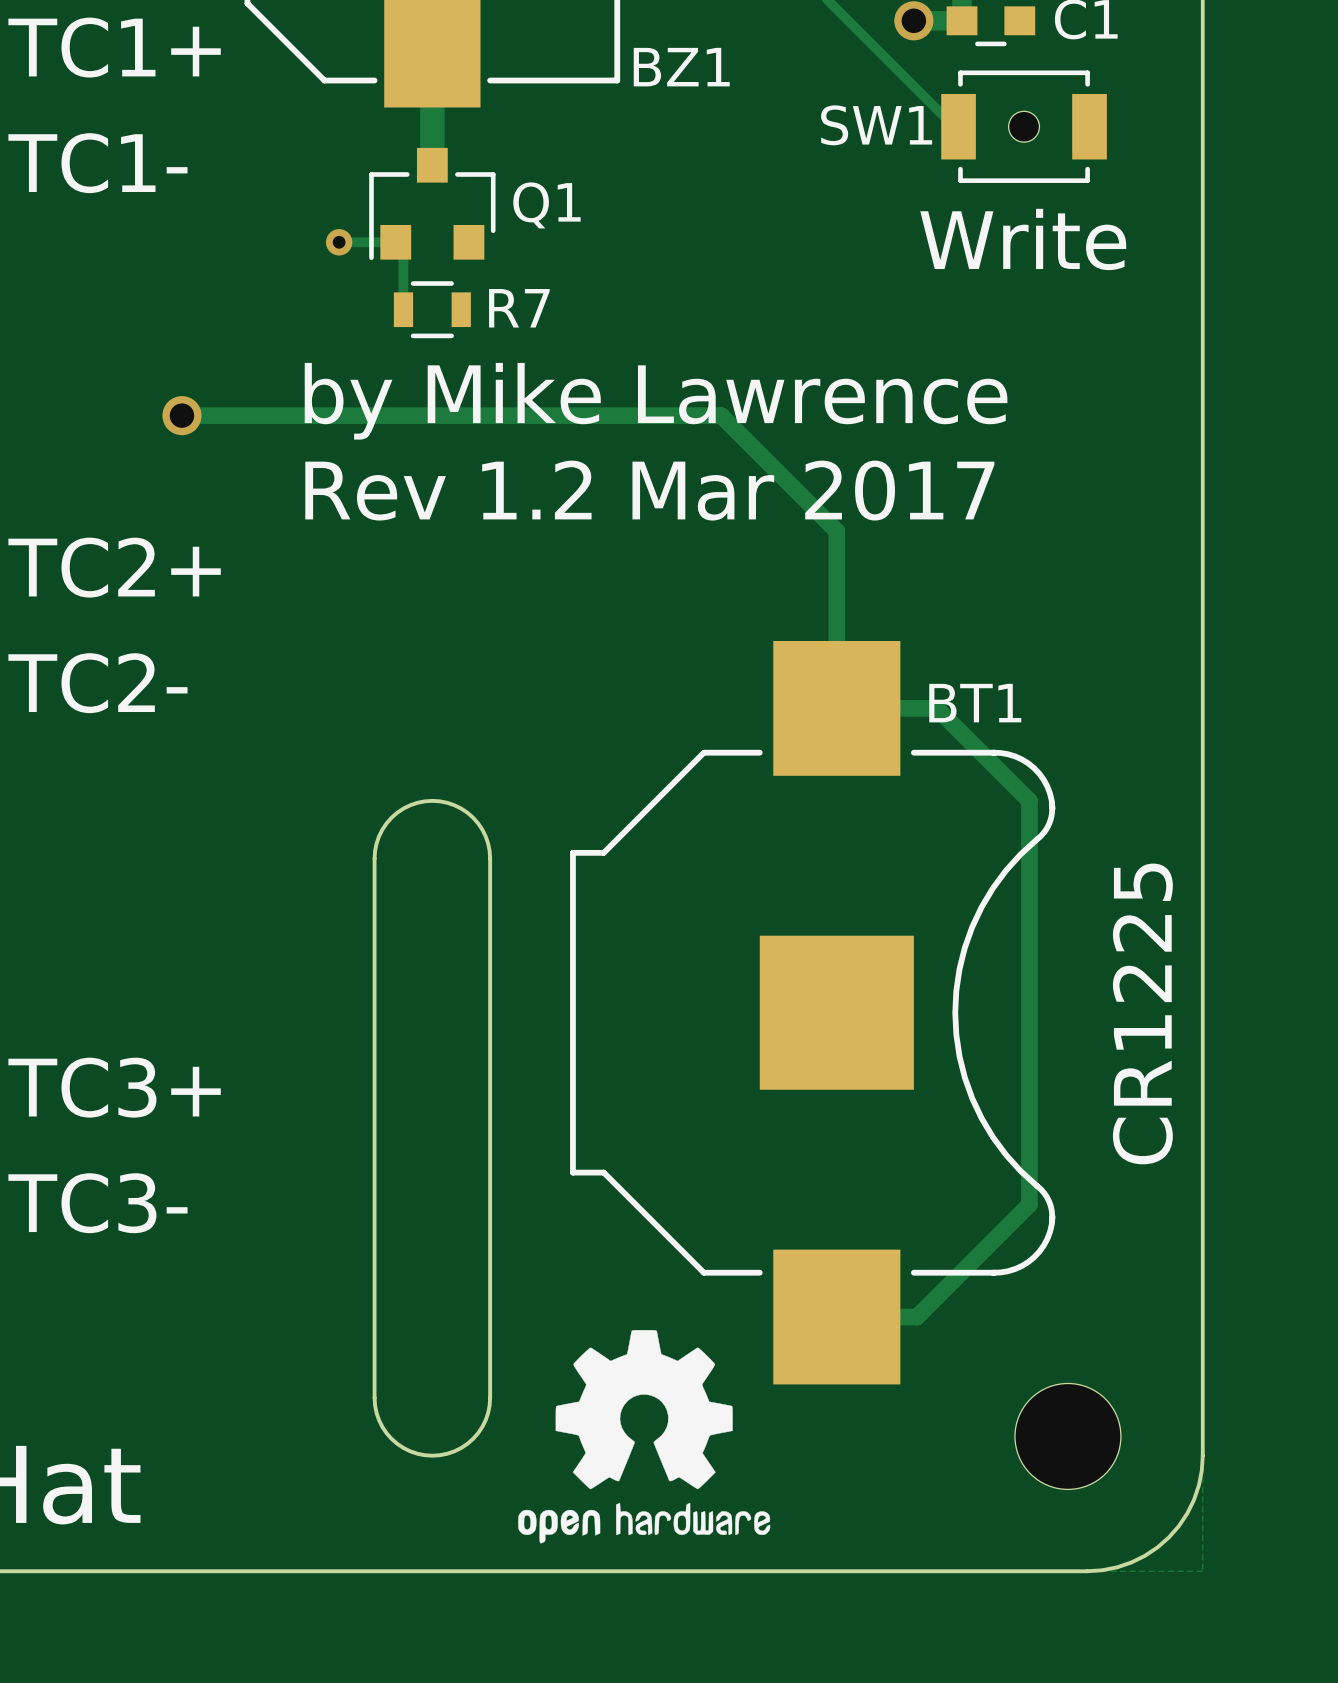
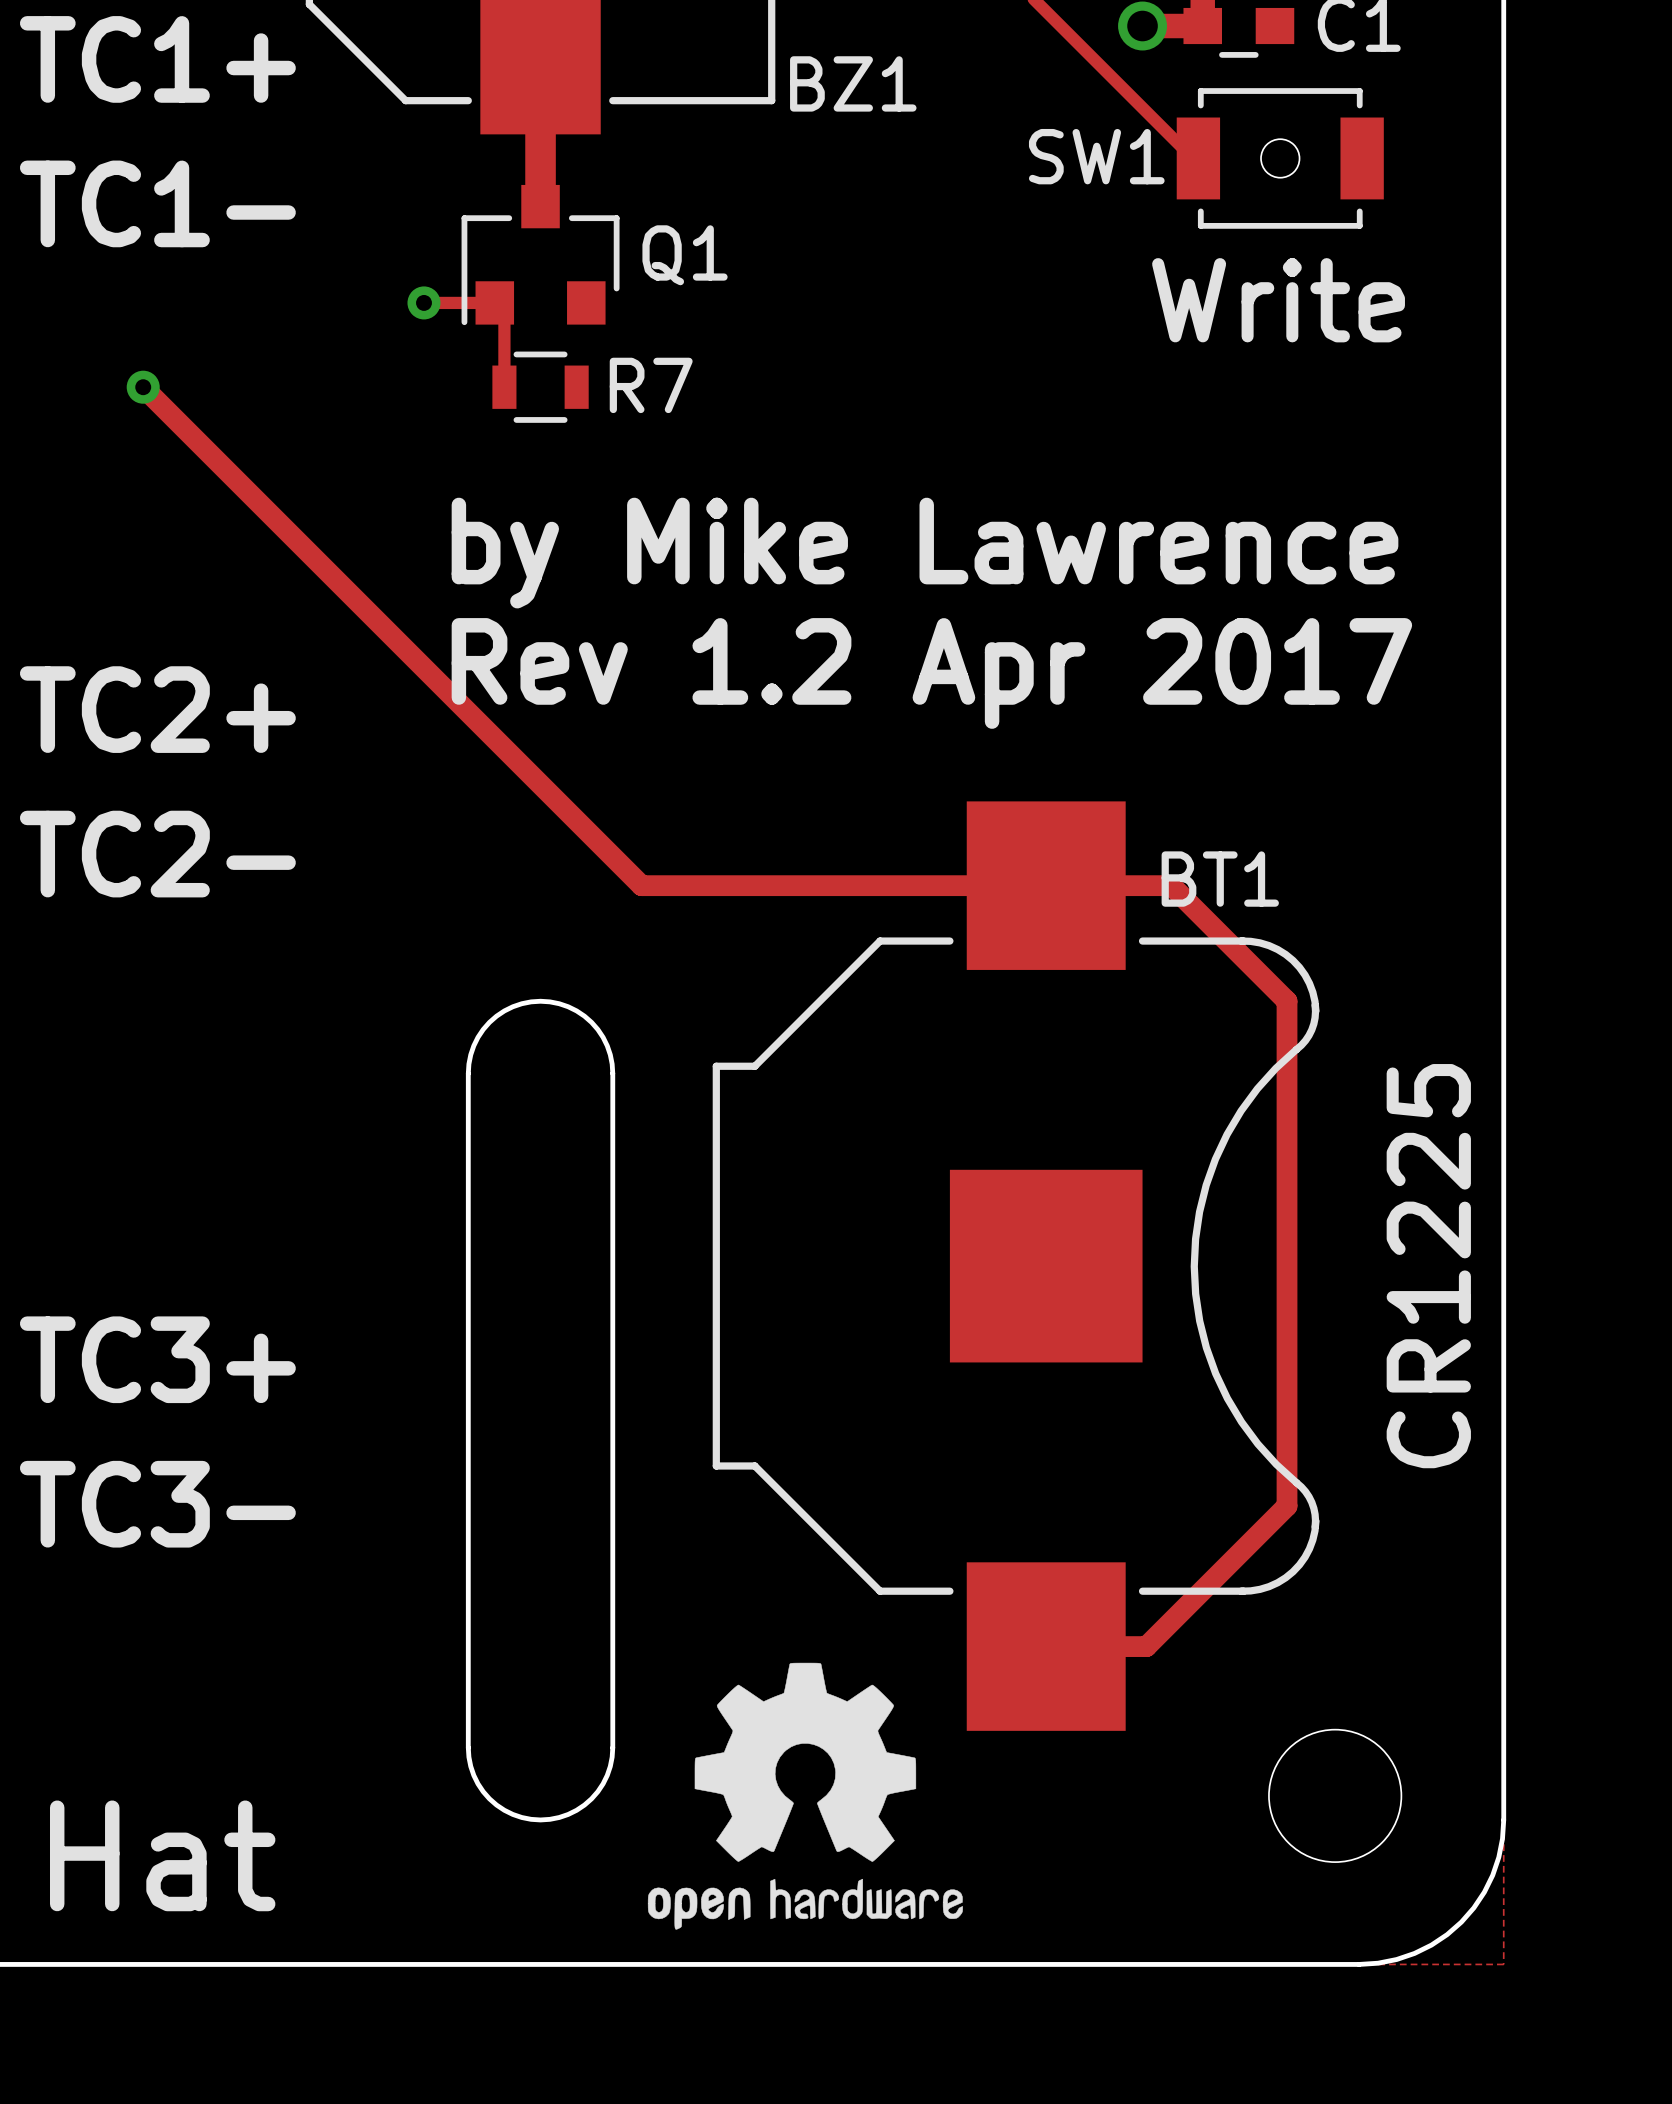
via: none -> (143, 387)
text position: by Mike Lawrence (656, 401) -> by Mike Lawrence (925, 553)
track: (181, 415) (721, 415) (836, 531) (836, 708) -> (143, 387) (641, 885) (1046, 885)
via: (181, 415) -> none
text: Rev 1.2 Mar 2017 (649, 490) -> Rev 1.2 Apr 2017 (931, 673)

